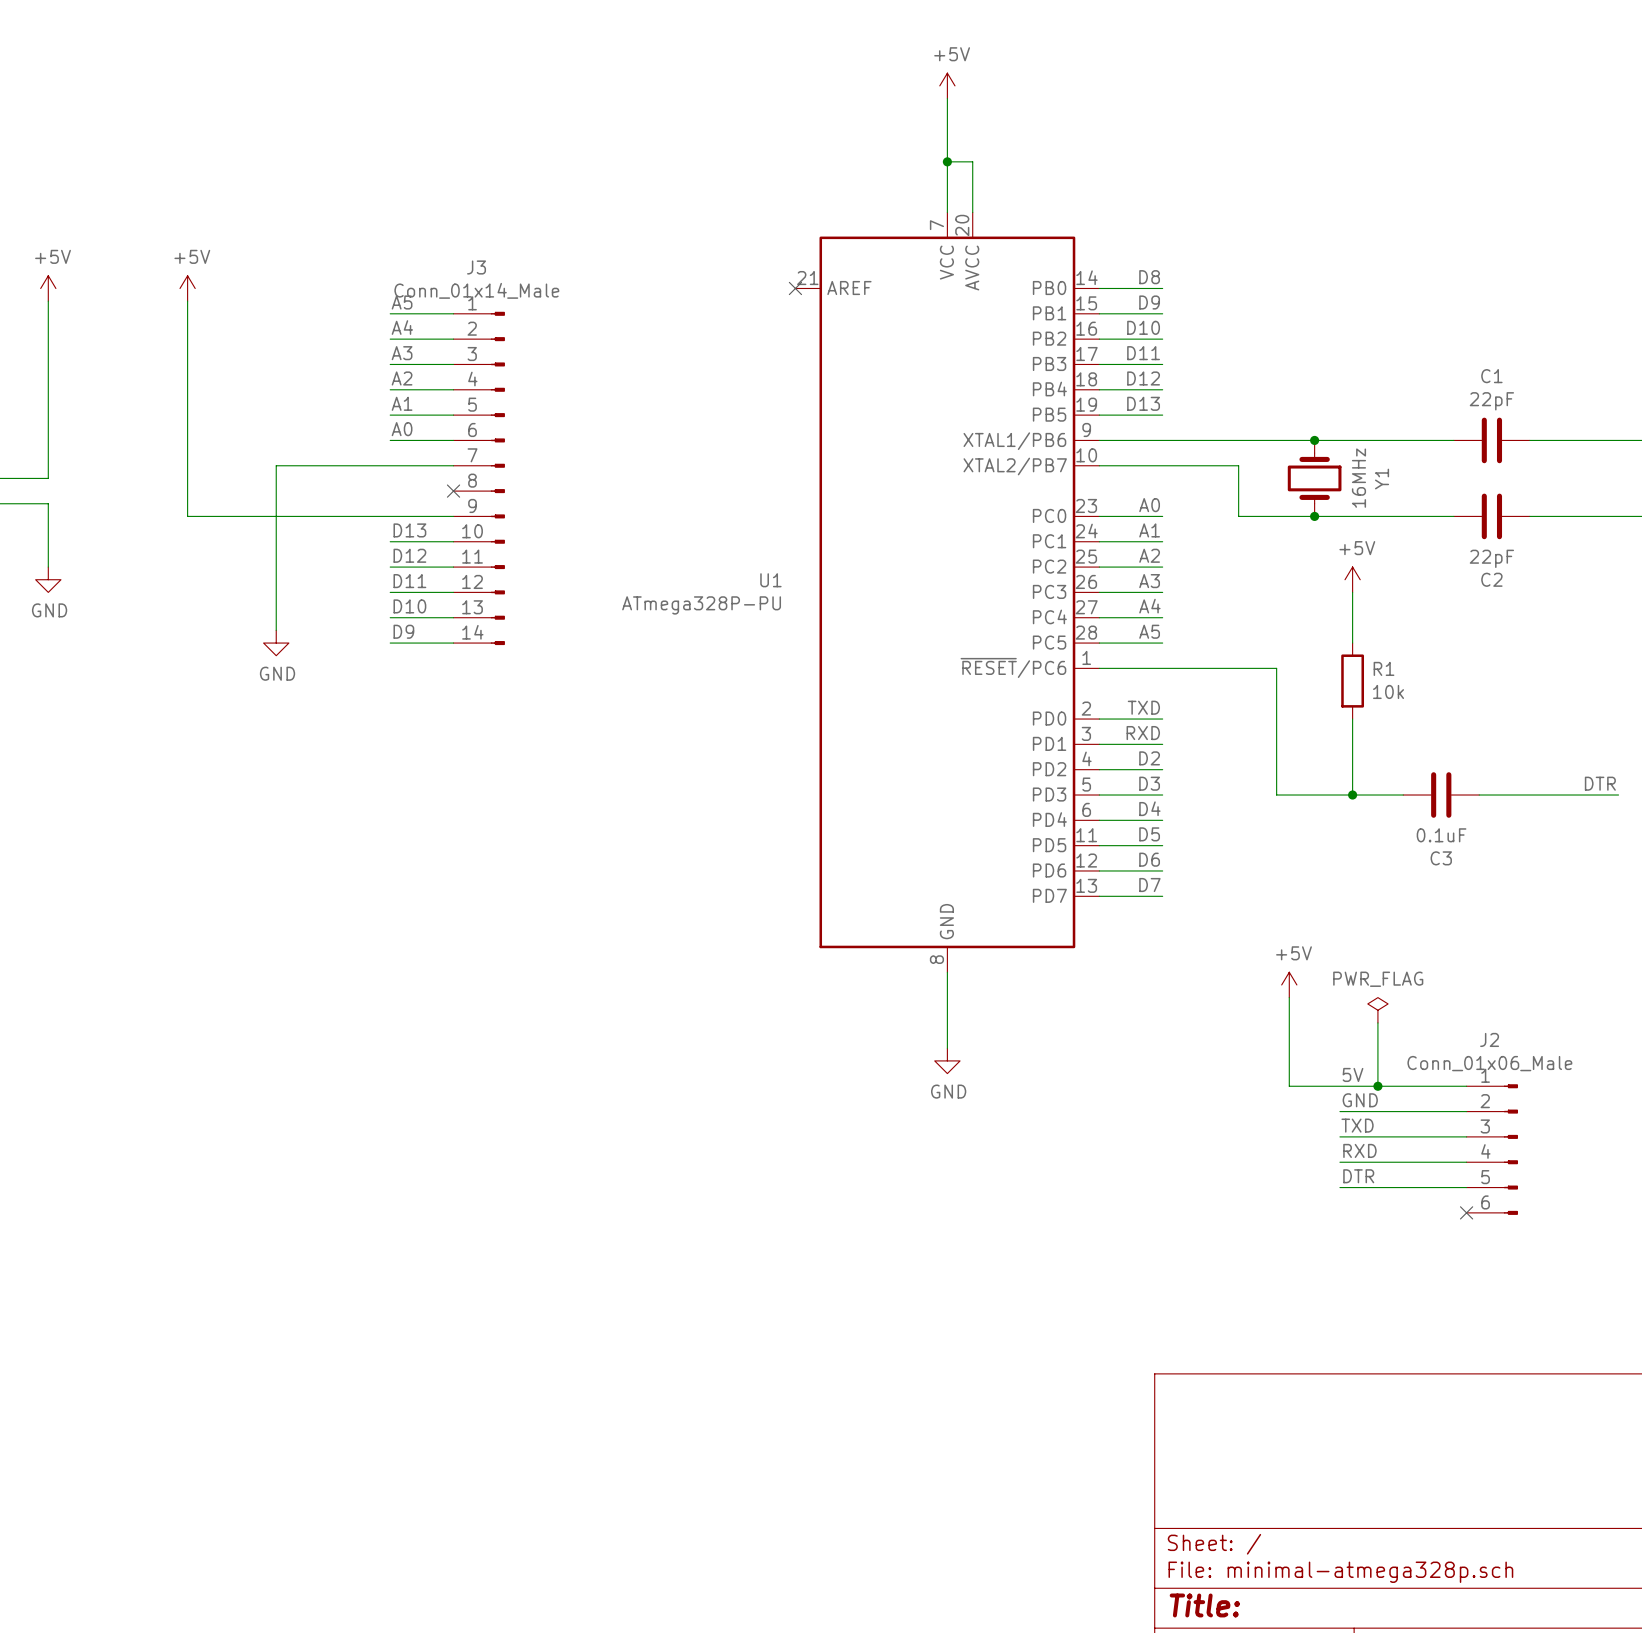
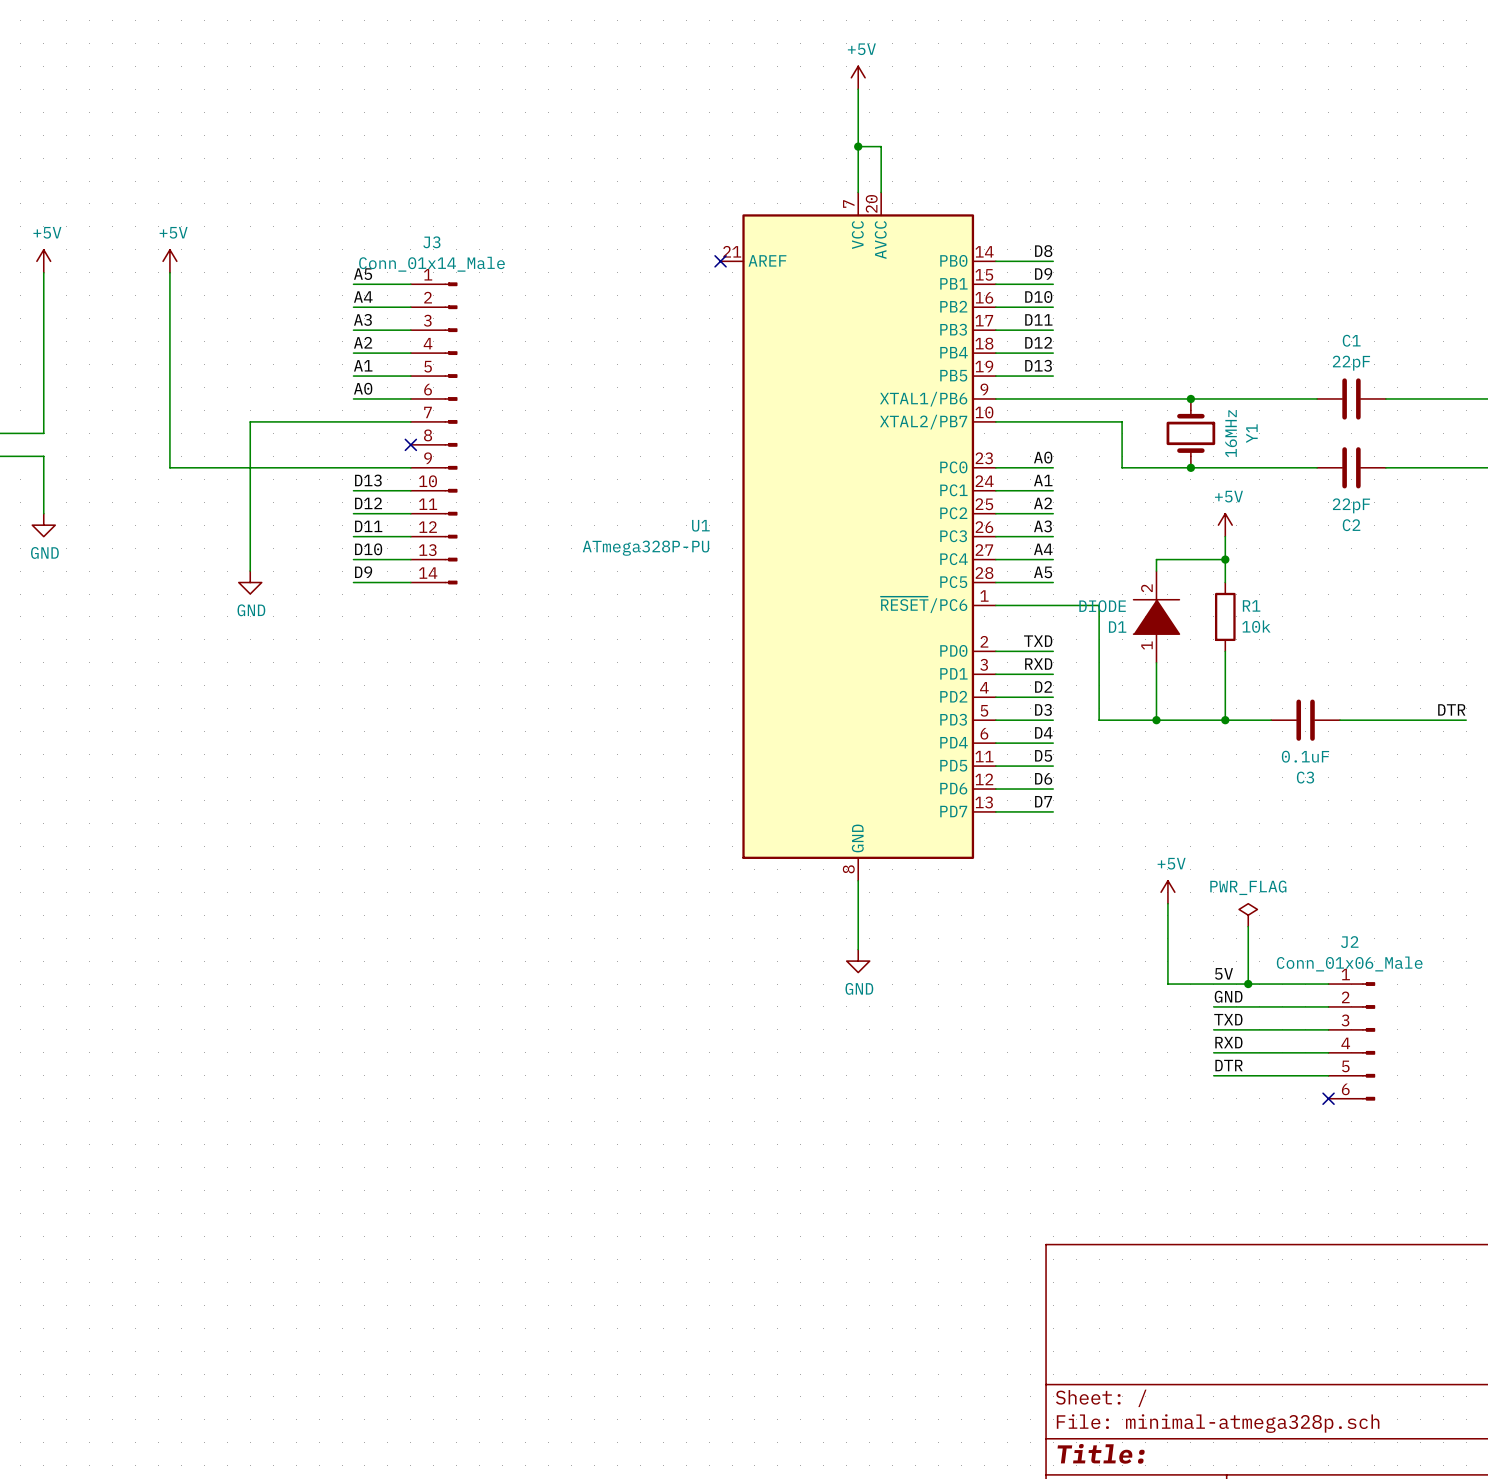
wire: none -> (1225, 559) (1156, 559) (1156, 571)
junction: none -> (1225, 559)
wire: (1213, 668) (1276, 668) (1276, 731) -> (1099, 605) (1099, 720) (1156, 720)
D1: none -> DIODE (1156, 616)
junction: none -> (1156, 720)

